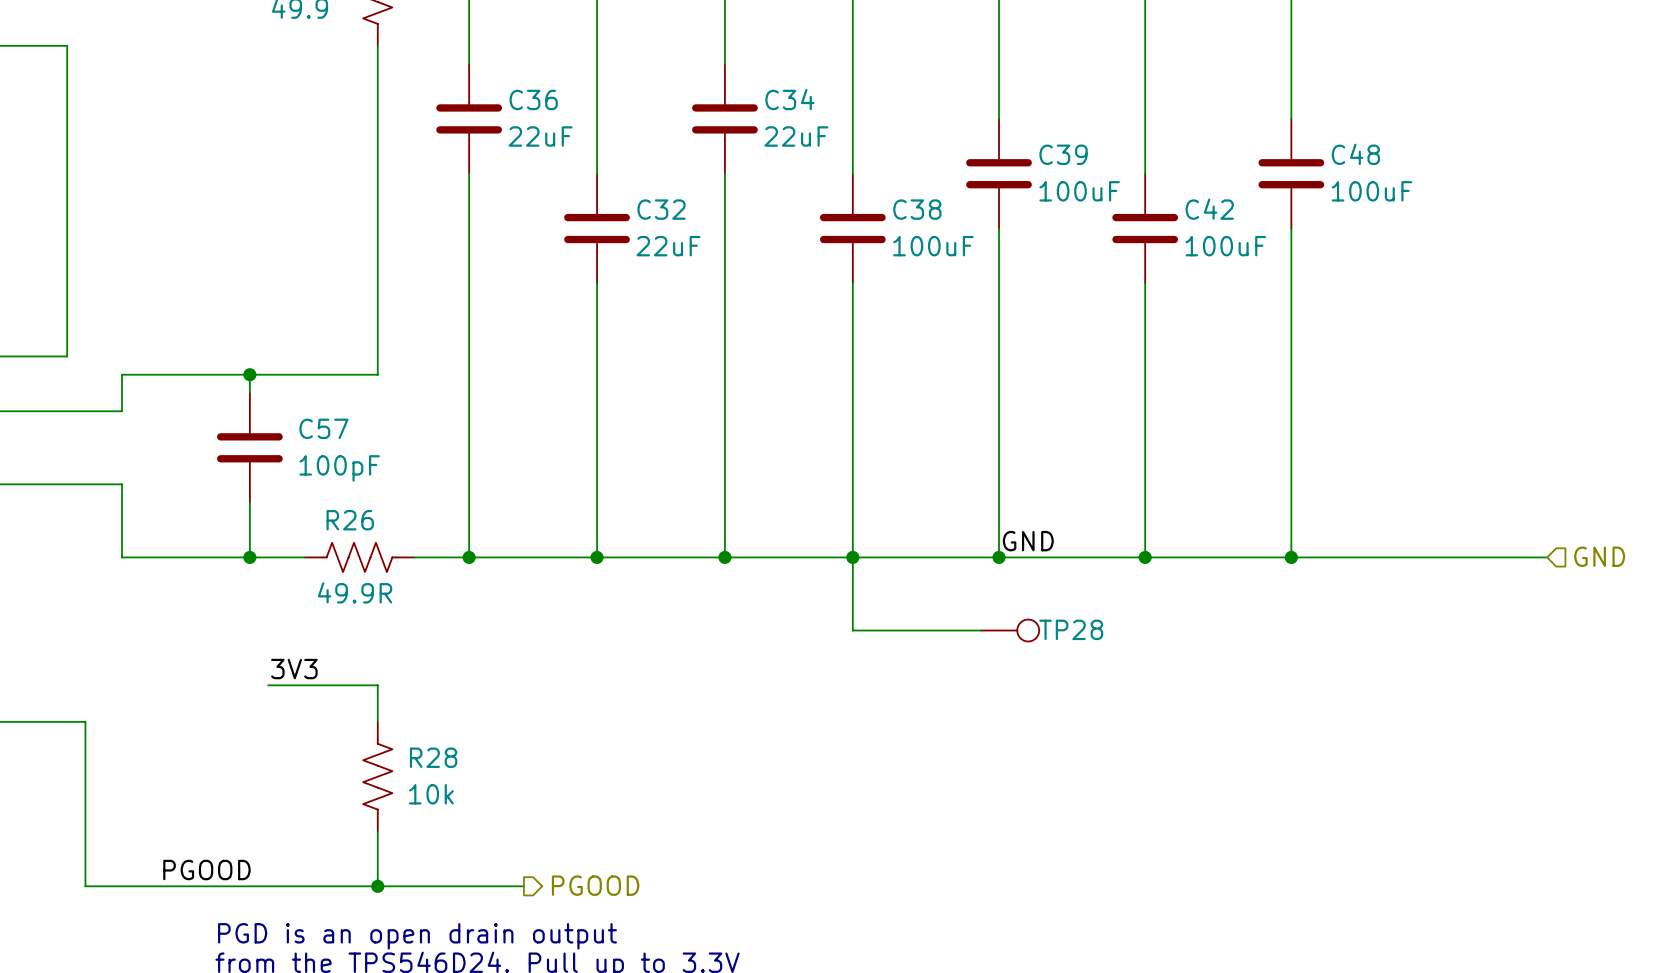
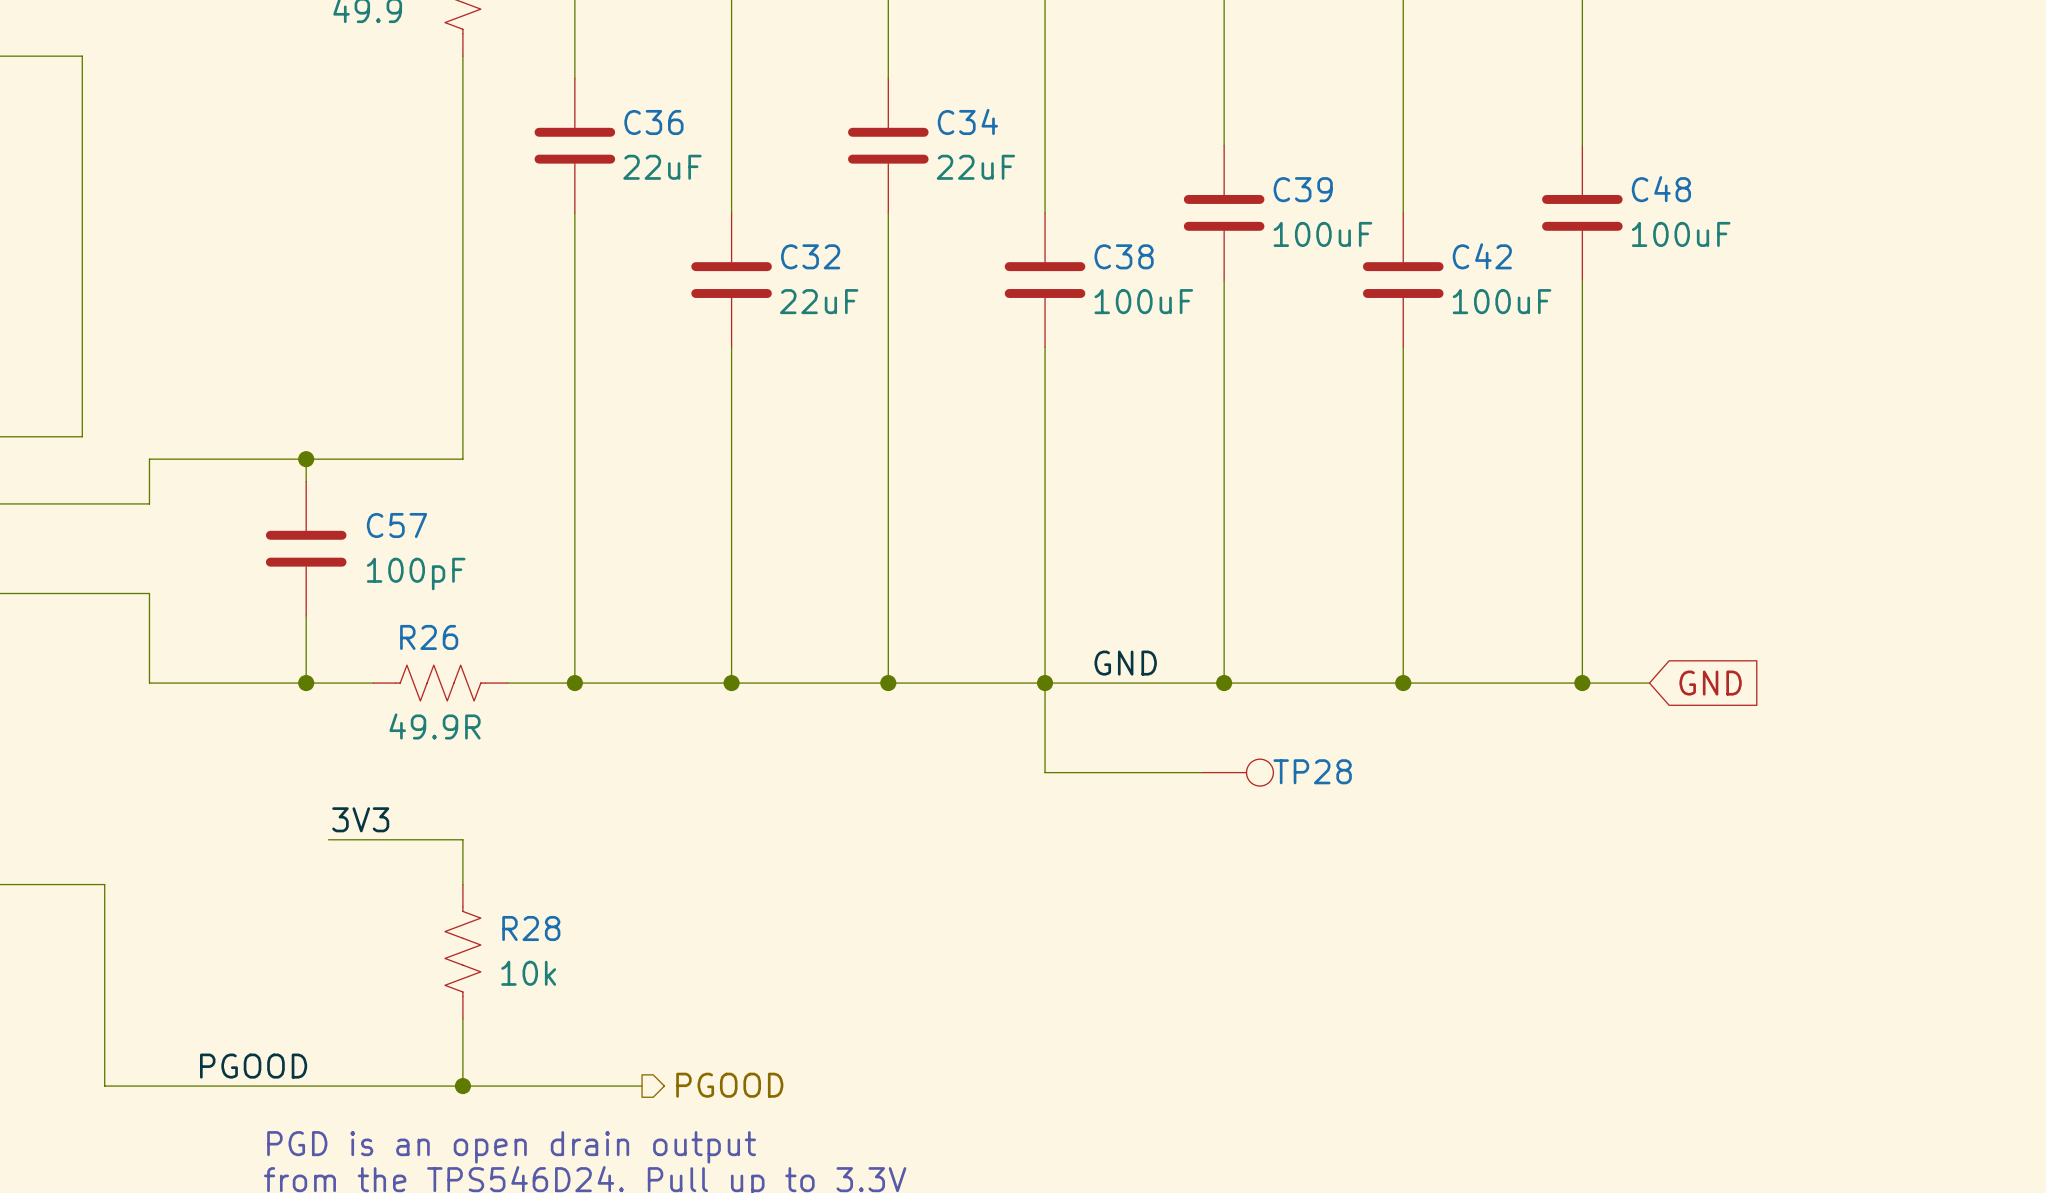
label position: GND (1028, 541) -> GND (1125, 663)
hierarchical label: GND (1599, 556) -> none
wire: (1346, 557) (1547, 557) -> none
global label: none -> GND (1710, 683)

